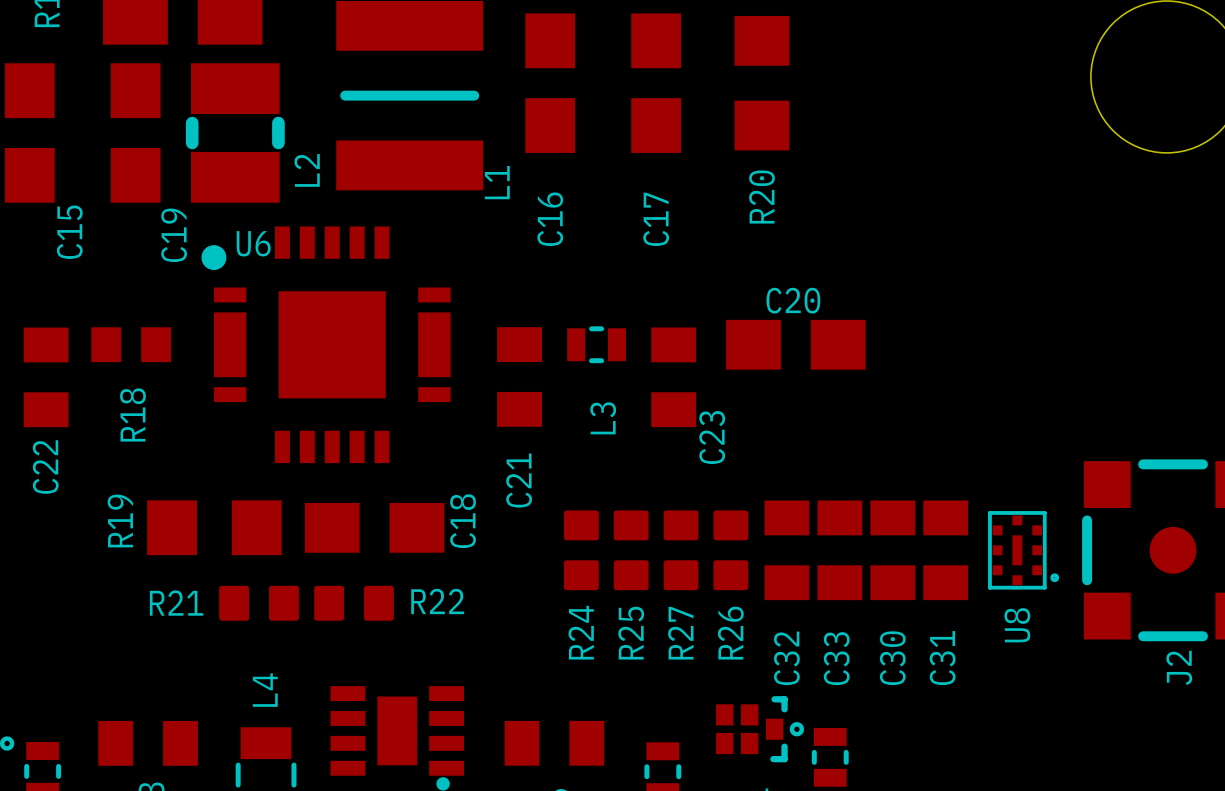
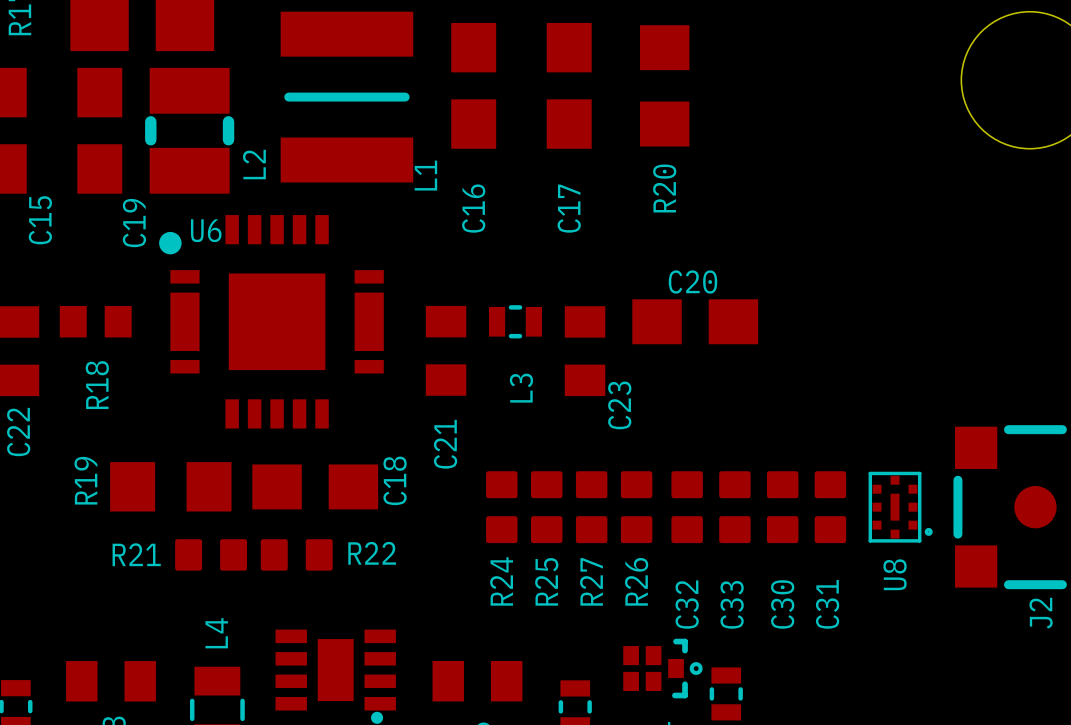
C32 footprint: [764, 500, 810, 601] -> [671, 471, 703, 544]
C33 footprint: [817, 500, 863, 601] -> [719, 471, 751, 544]
C30 footprint: [870, 500, 916, 601] -> [766, 471, 799, 544]
C31 footprint: [923, 500, 969, 601] -> [814, 471, 847, 544]

